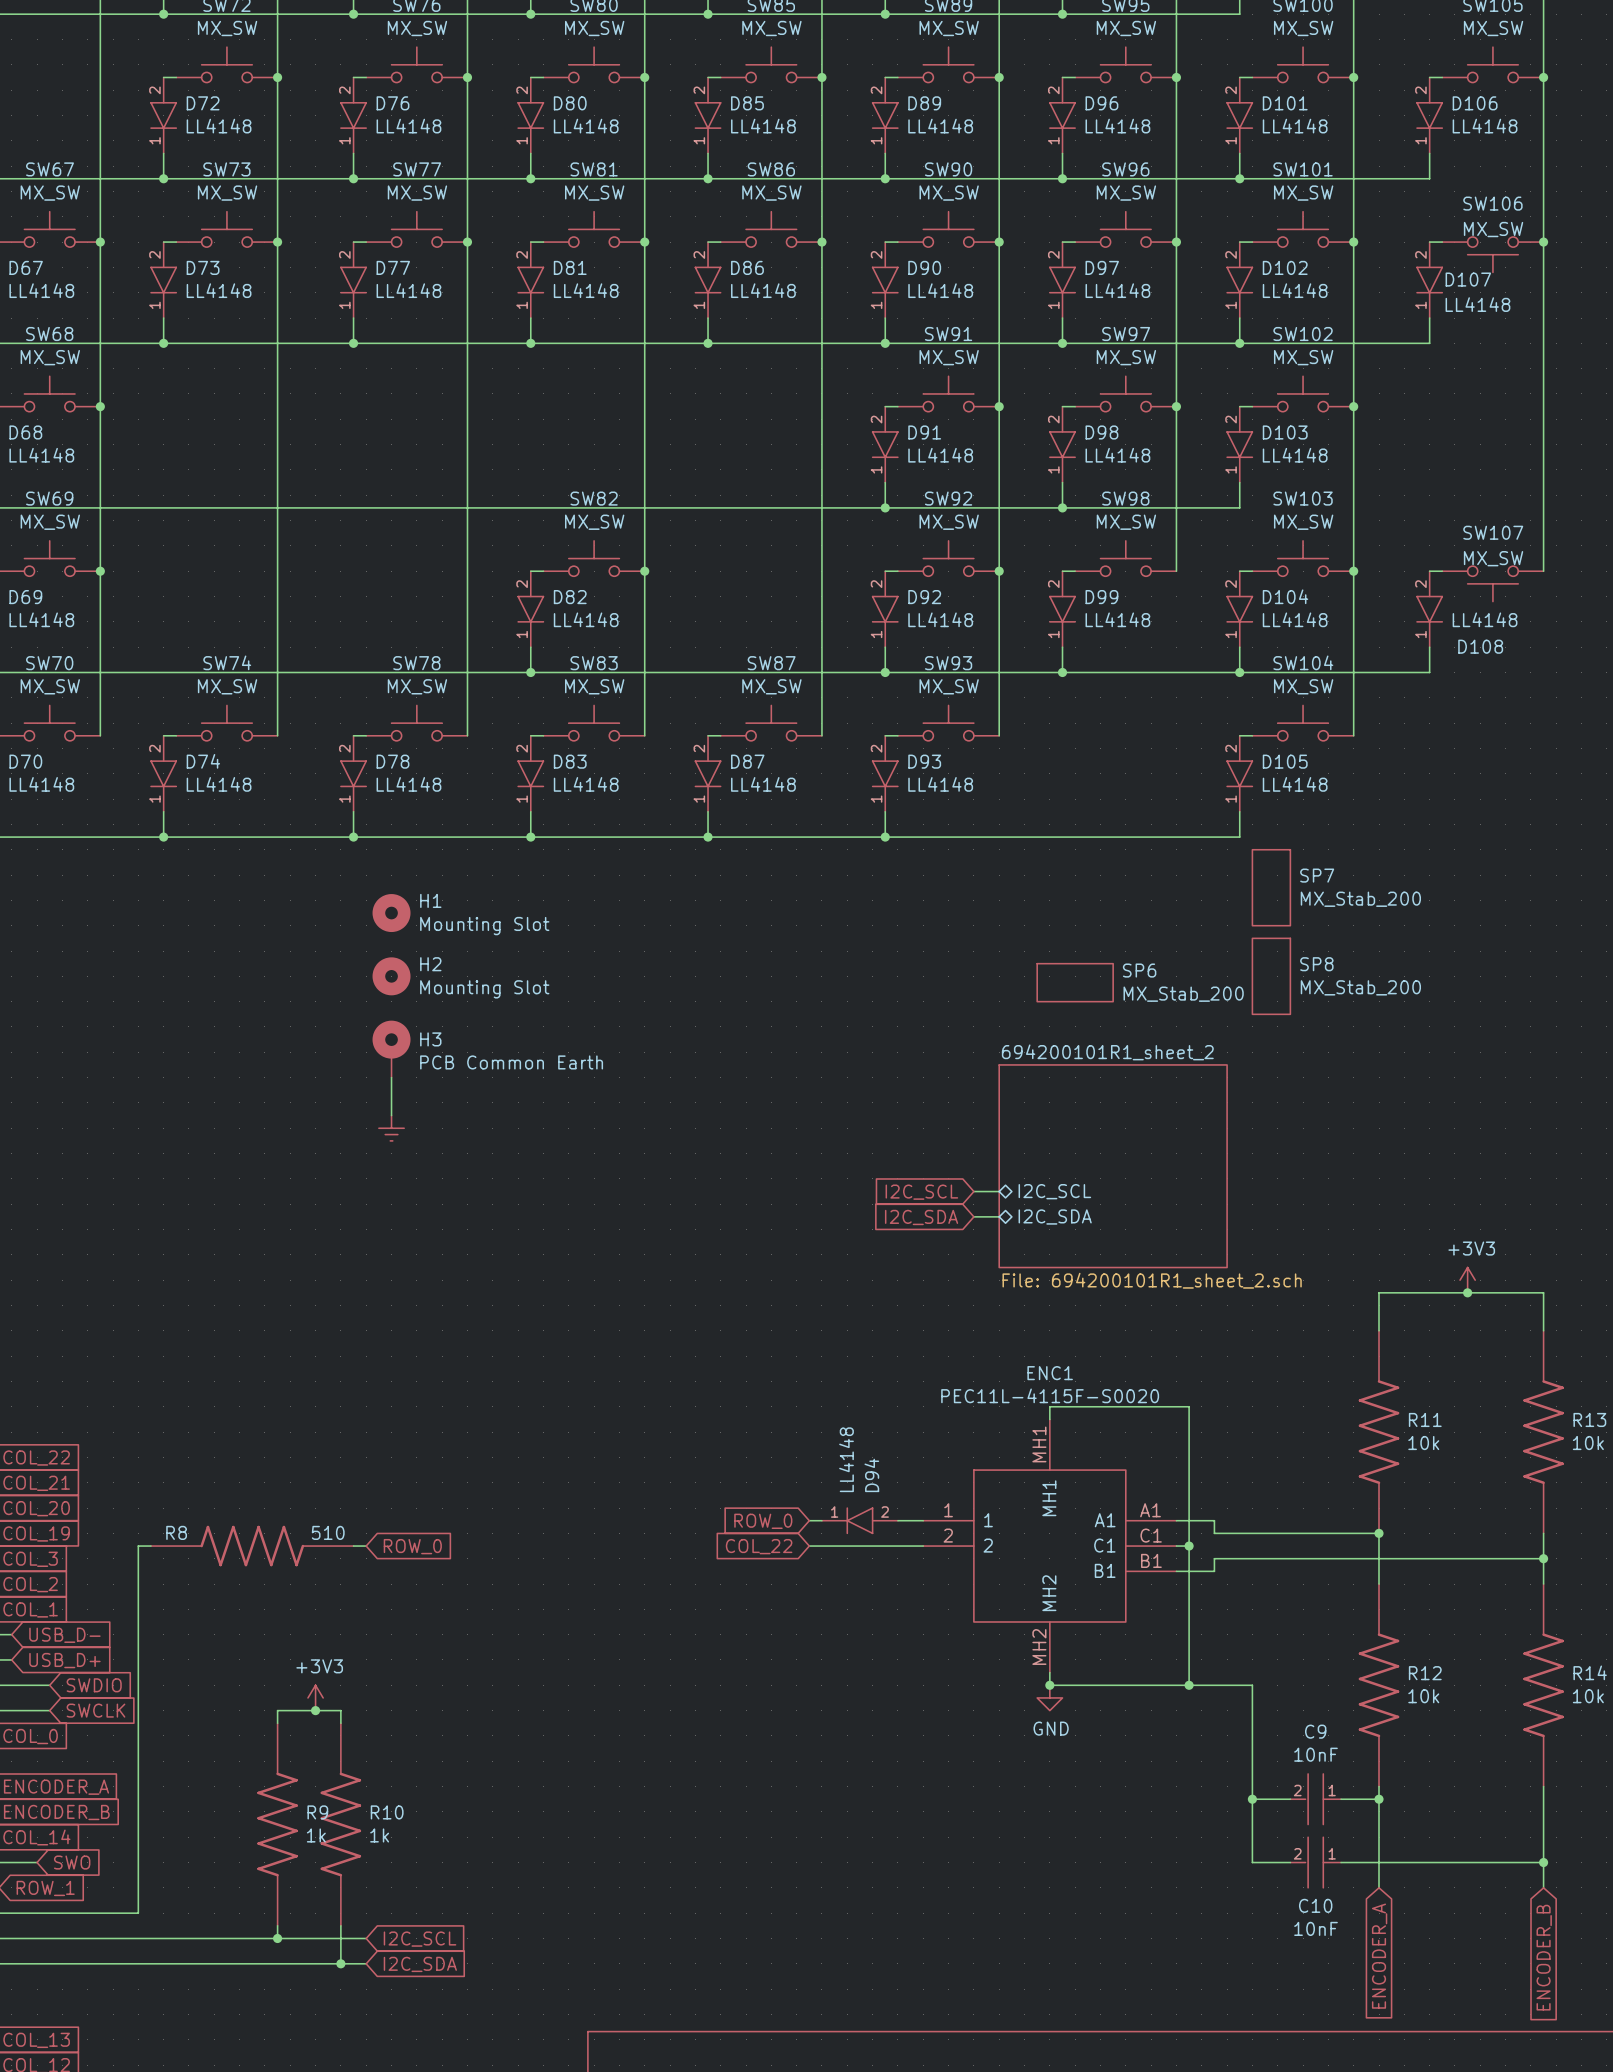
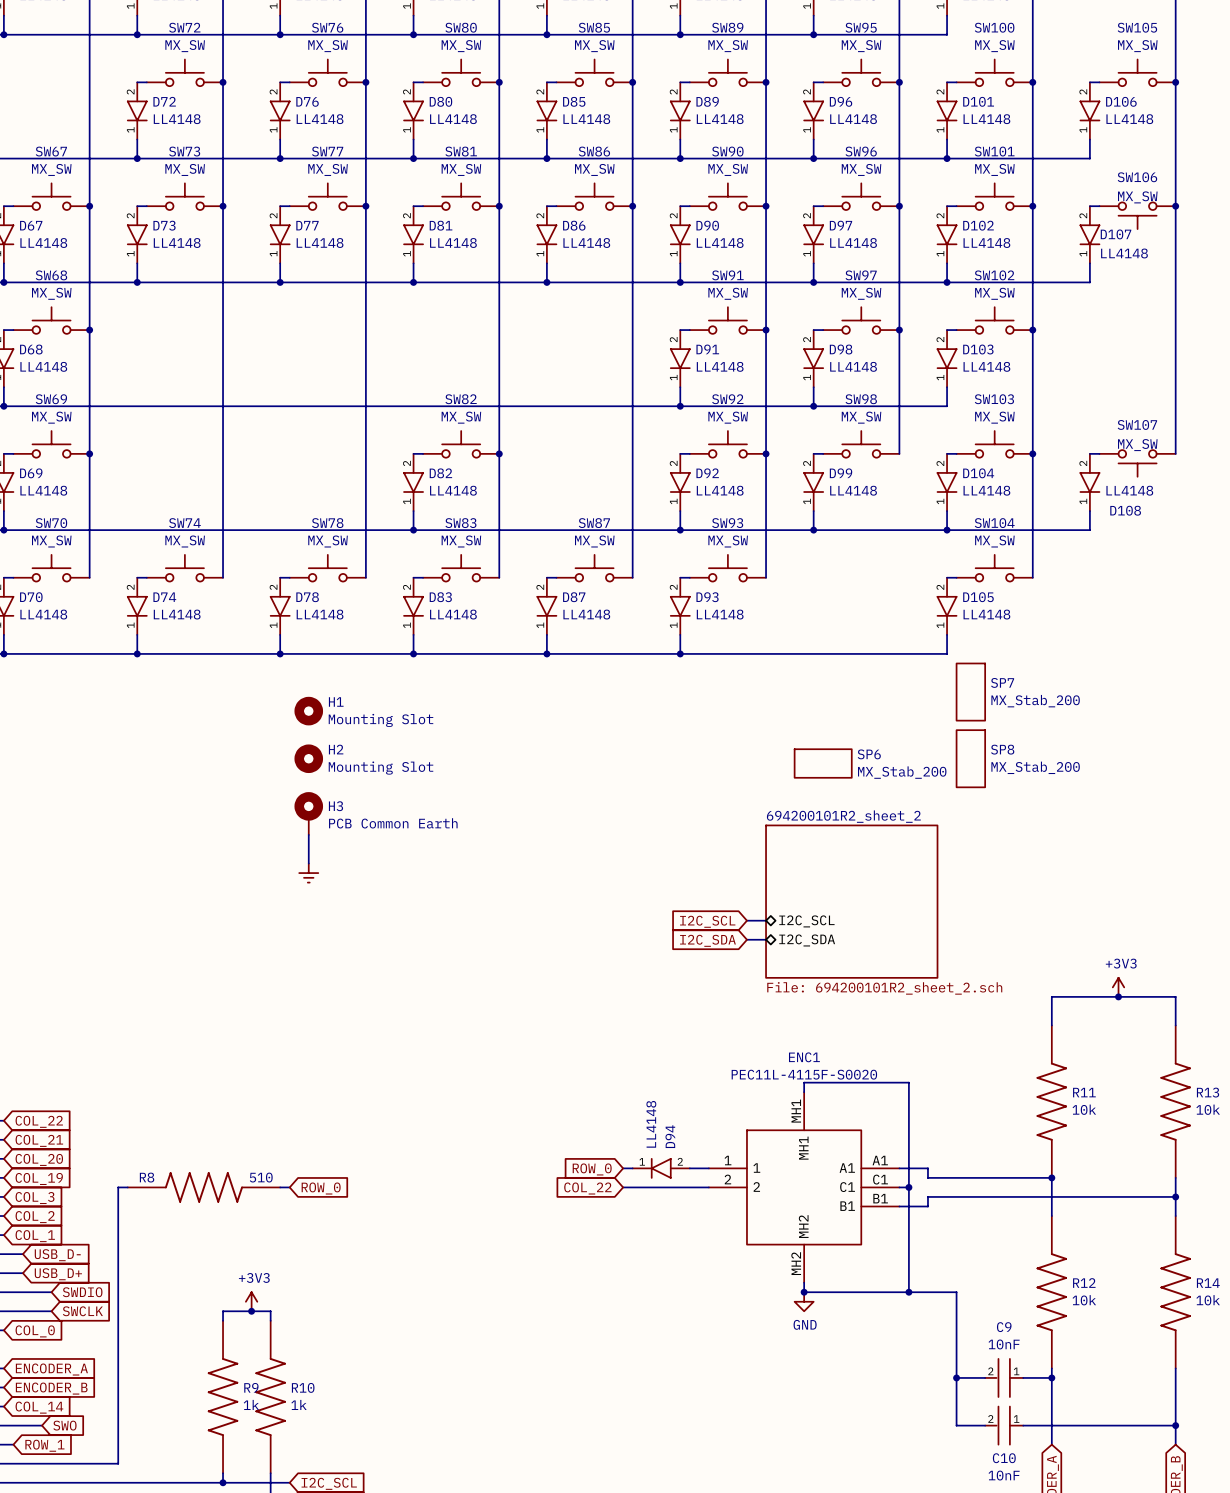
sheet 694200101R1_sheet_2 name: 694200101R1_sheet_2 (1107, 1052) -> 694200101R2_sheet_2 (843, 816)
sheet 694200101R1_sheet_2 value: File: 694200101R1_sheet_2.sch (1152, 1280) -> File: 694200101R2_sheet_2.sch (884, 988)

